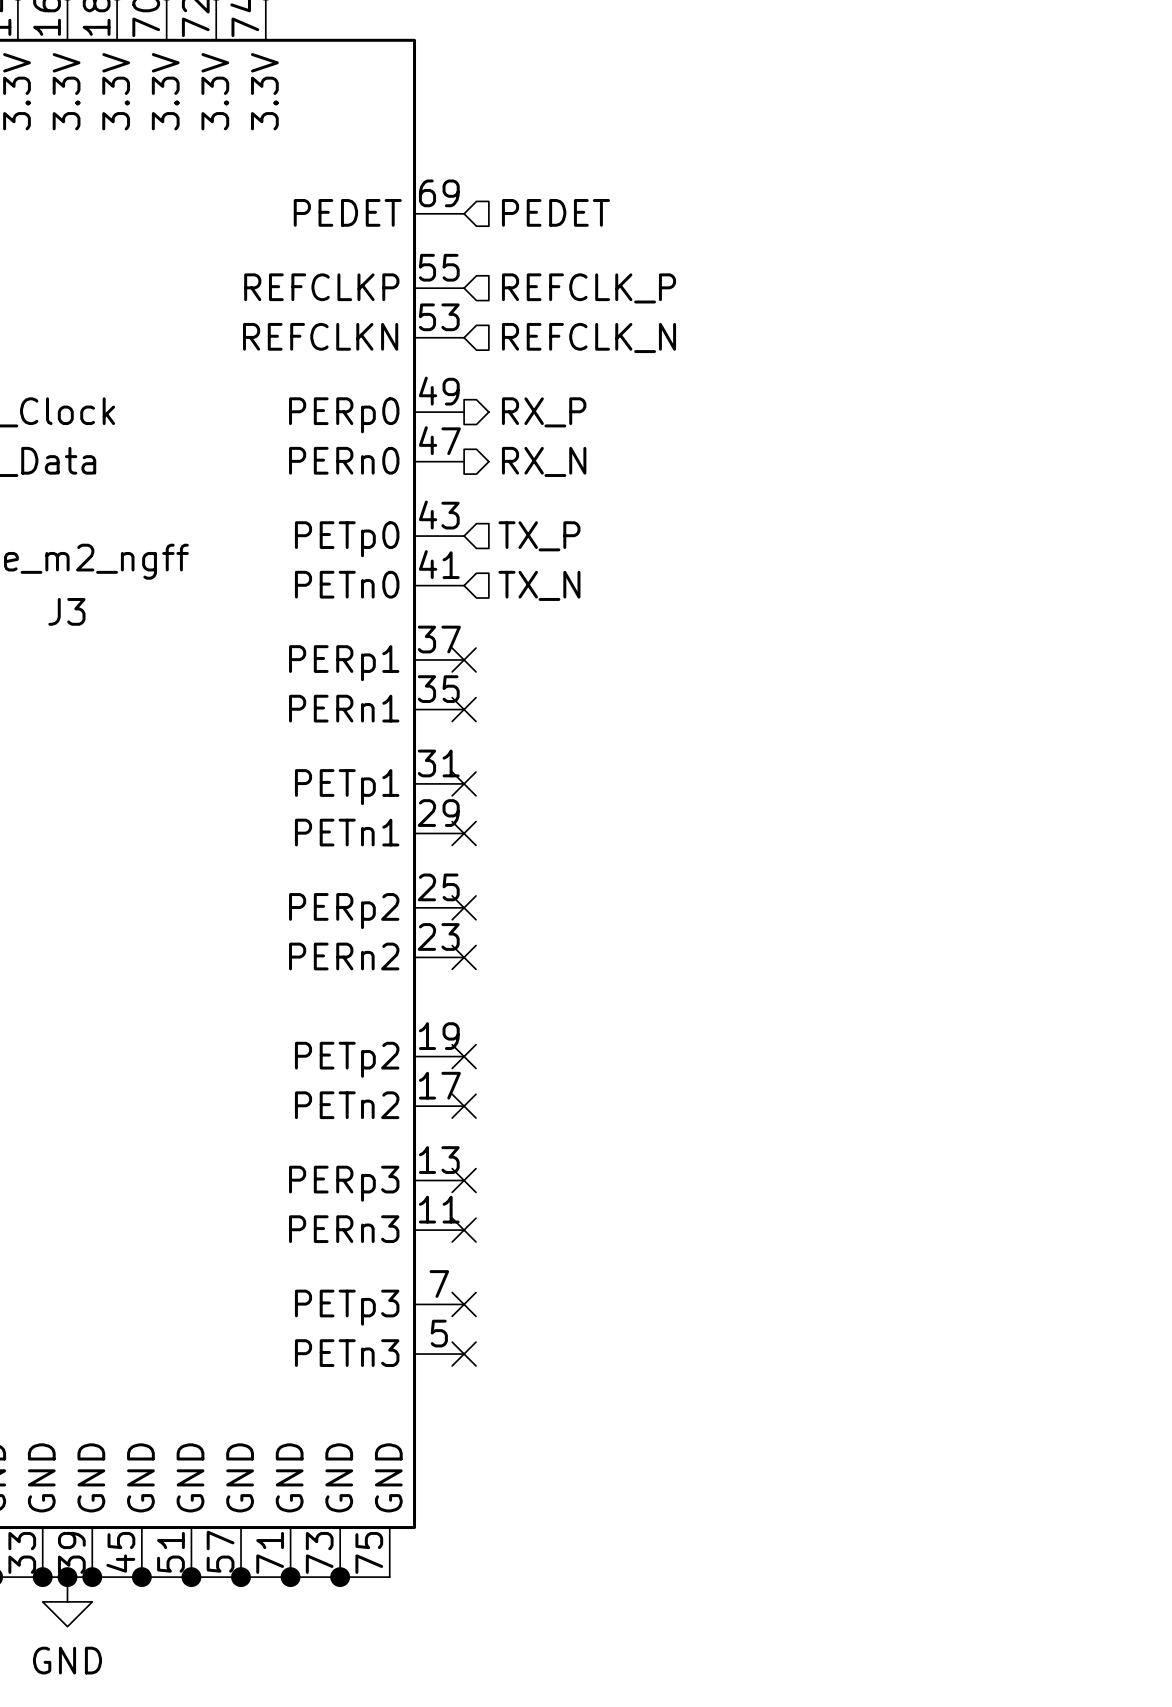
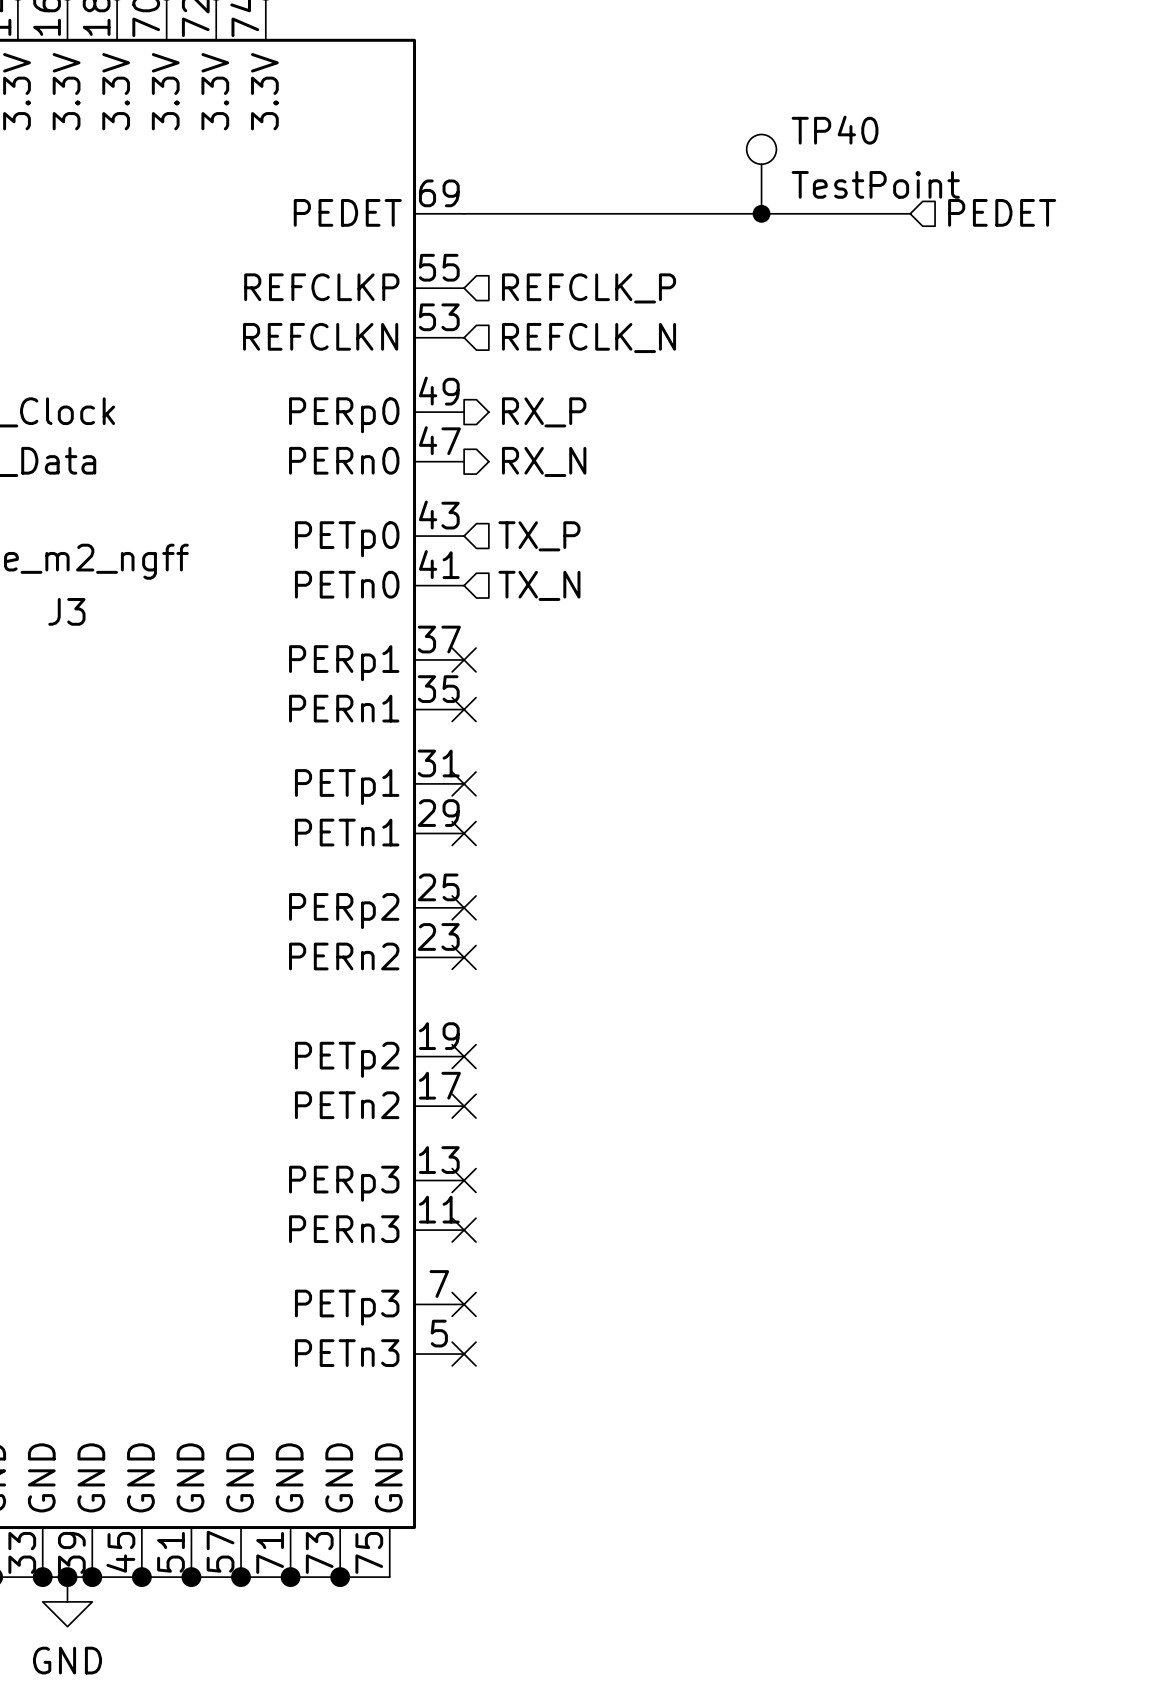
TP40: none -> TestPoint (761, 174)
hierarchical label position: PEDET (555, 212) -> PEDET (1002, 212)
wire: none -> (464, 213) (910, 213)
junction: none -> (761, 213)

